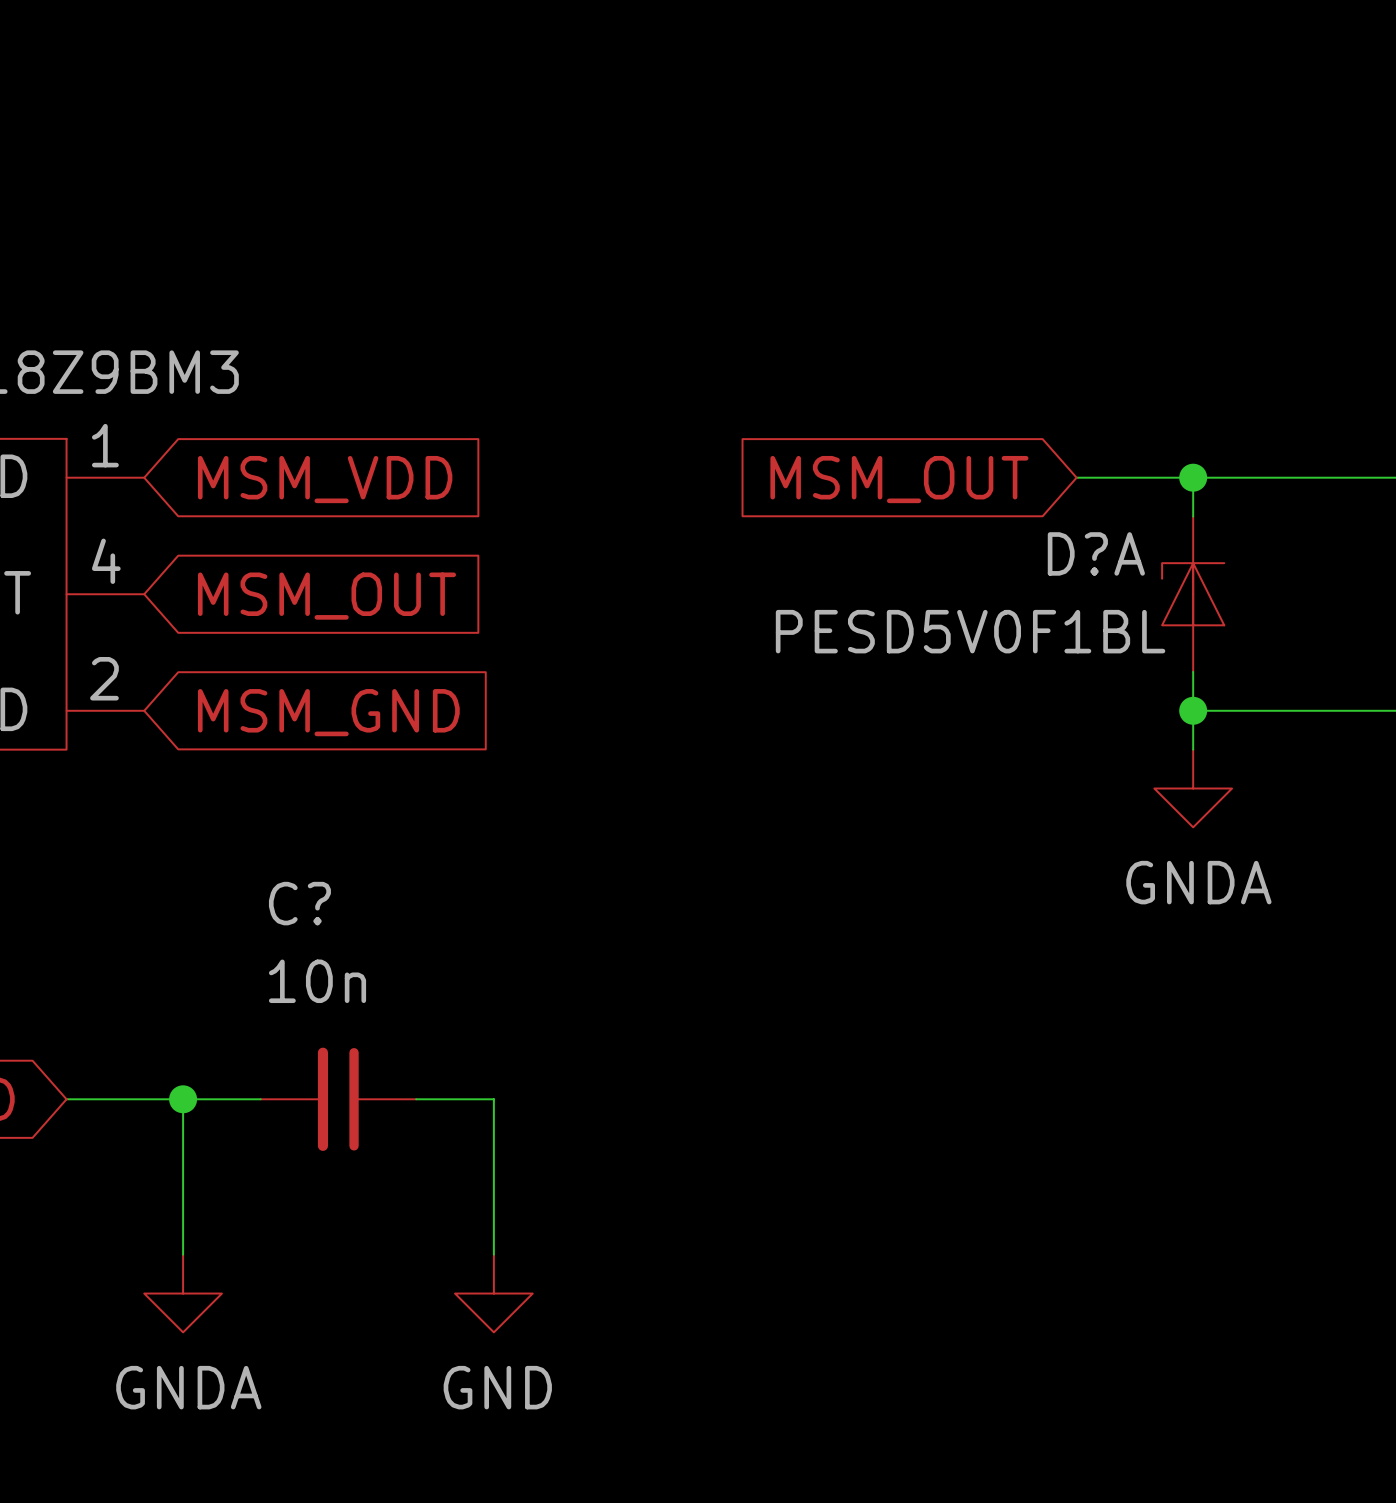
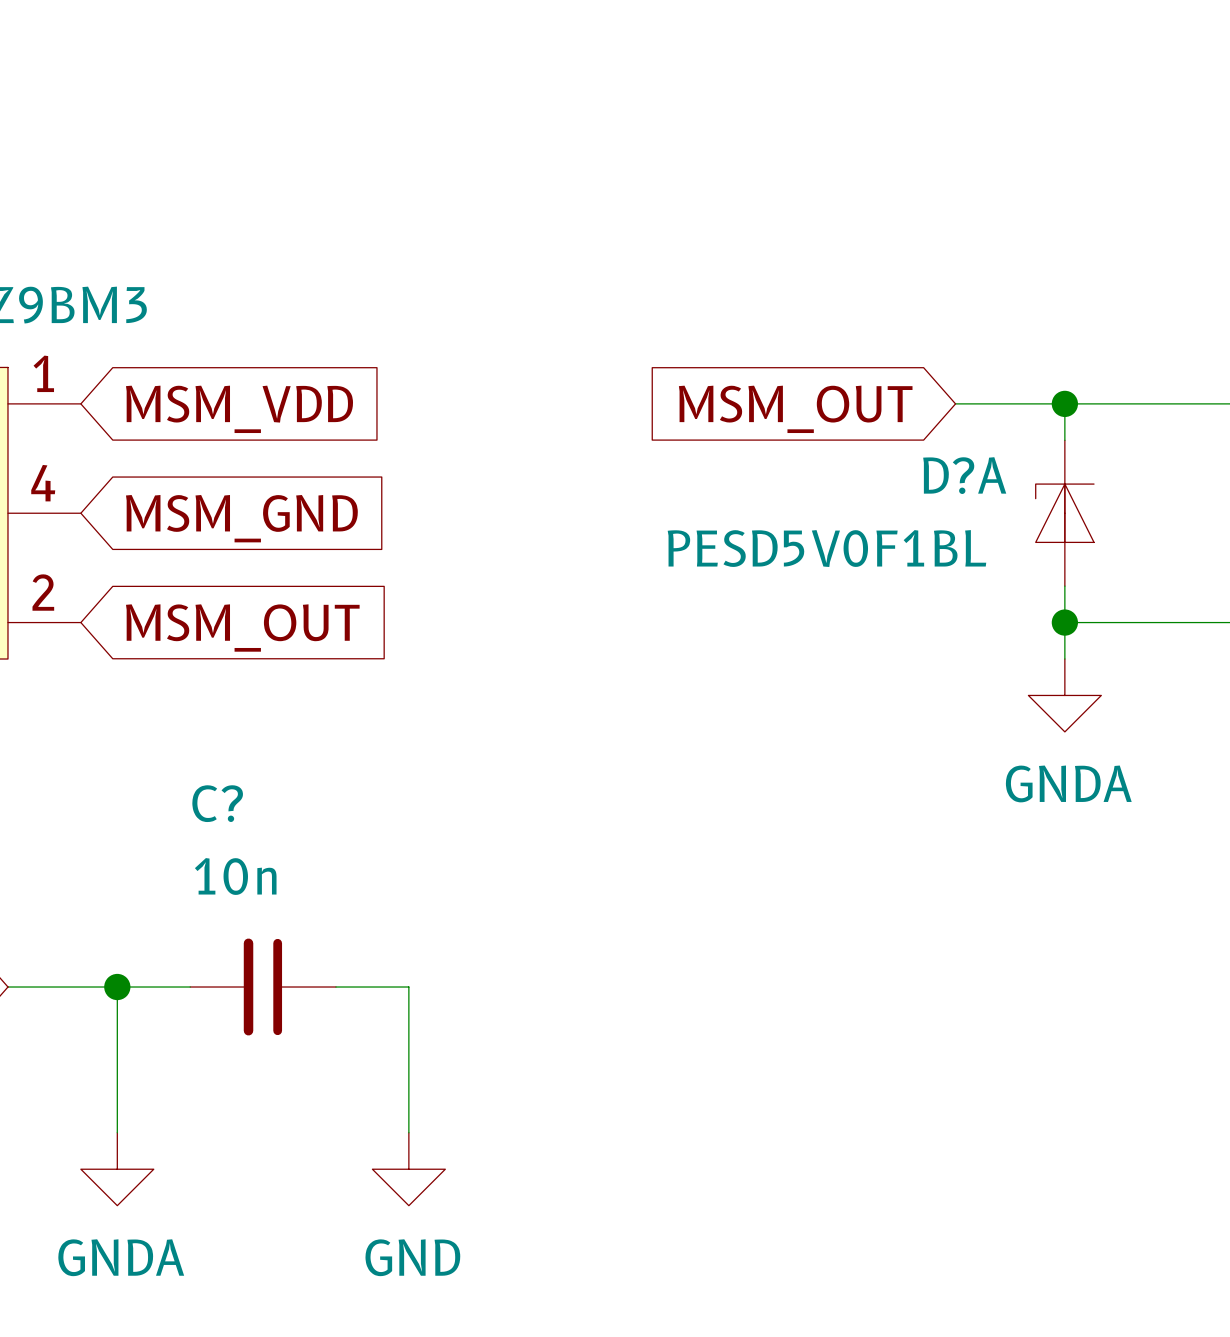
global label: MSM_OUT (326, 596) -> MSM_GND (241, 518)
global label: MSM_GND (328, 712) -> MSM_OUT (242, 628)

